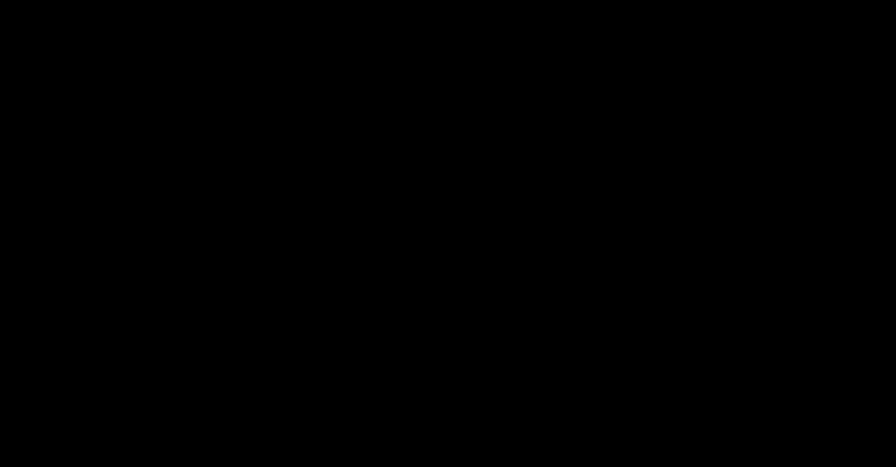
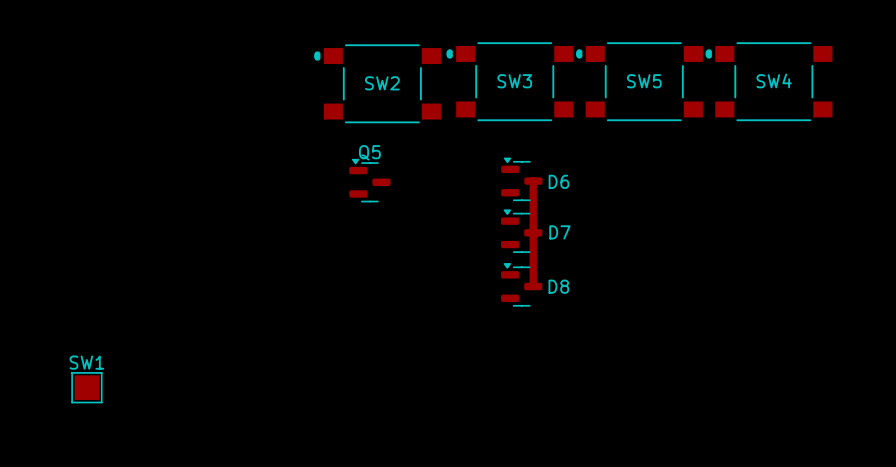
SW3: none -> (509, 81)
SW5: none -> (639, 81)
SW4: none -> (768, 81)
SW2: none -> (377, 83)
D6: none -> (521, 179)
Q5: none -> (369, 180)
track: none -> (533, 181) (533, 286)
D7: none -> (521, 231)
D8: none -> (521, 284)
SW1: none -> (86, 387)

